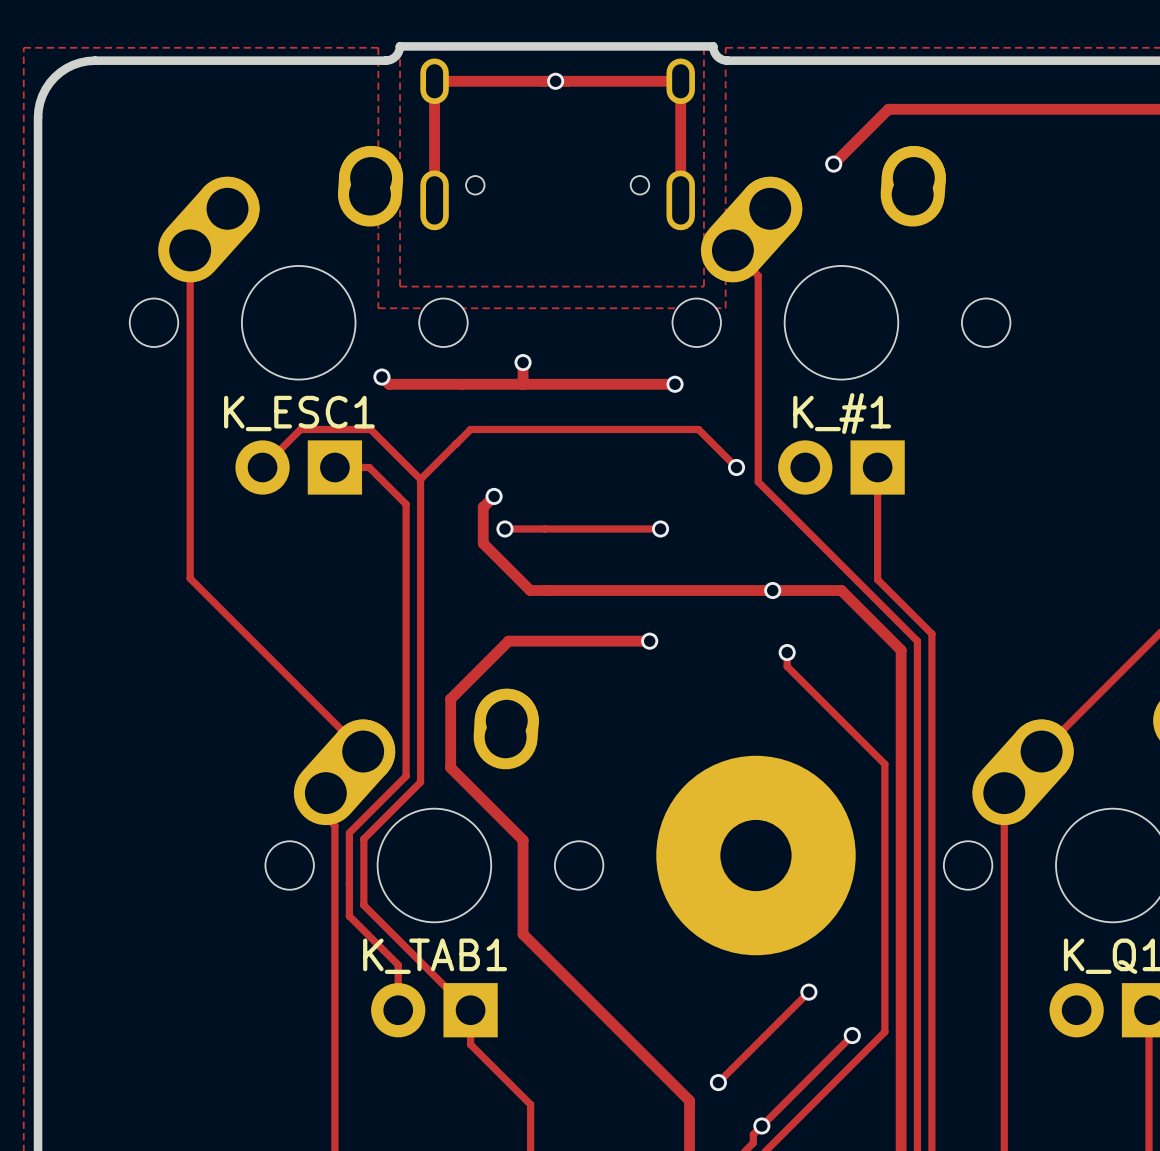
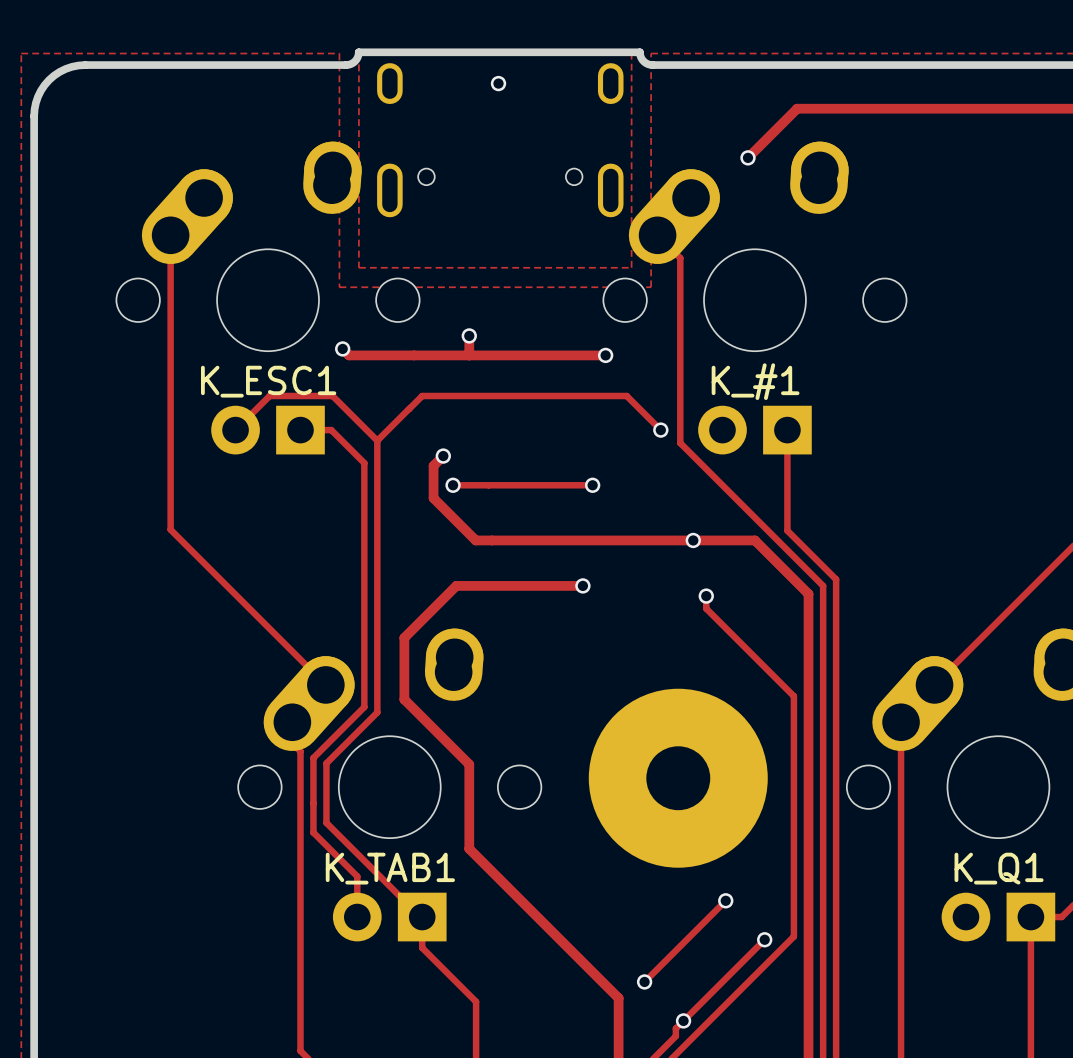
track: (434, 200) (434, 81) (680, 81) (680, 200) -> none

